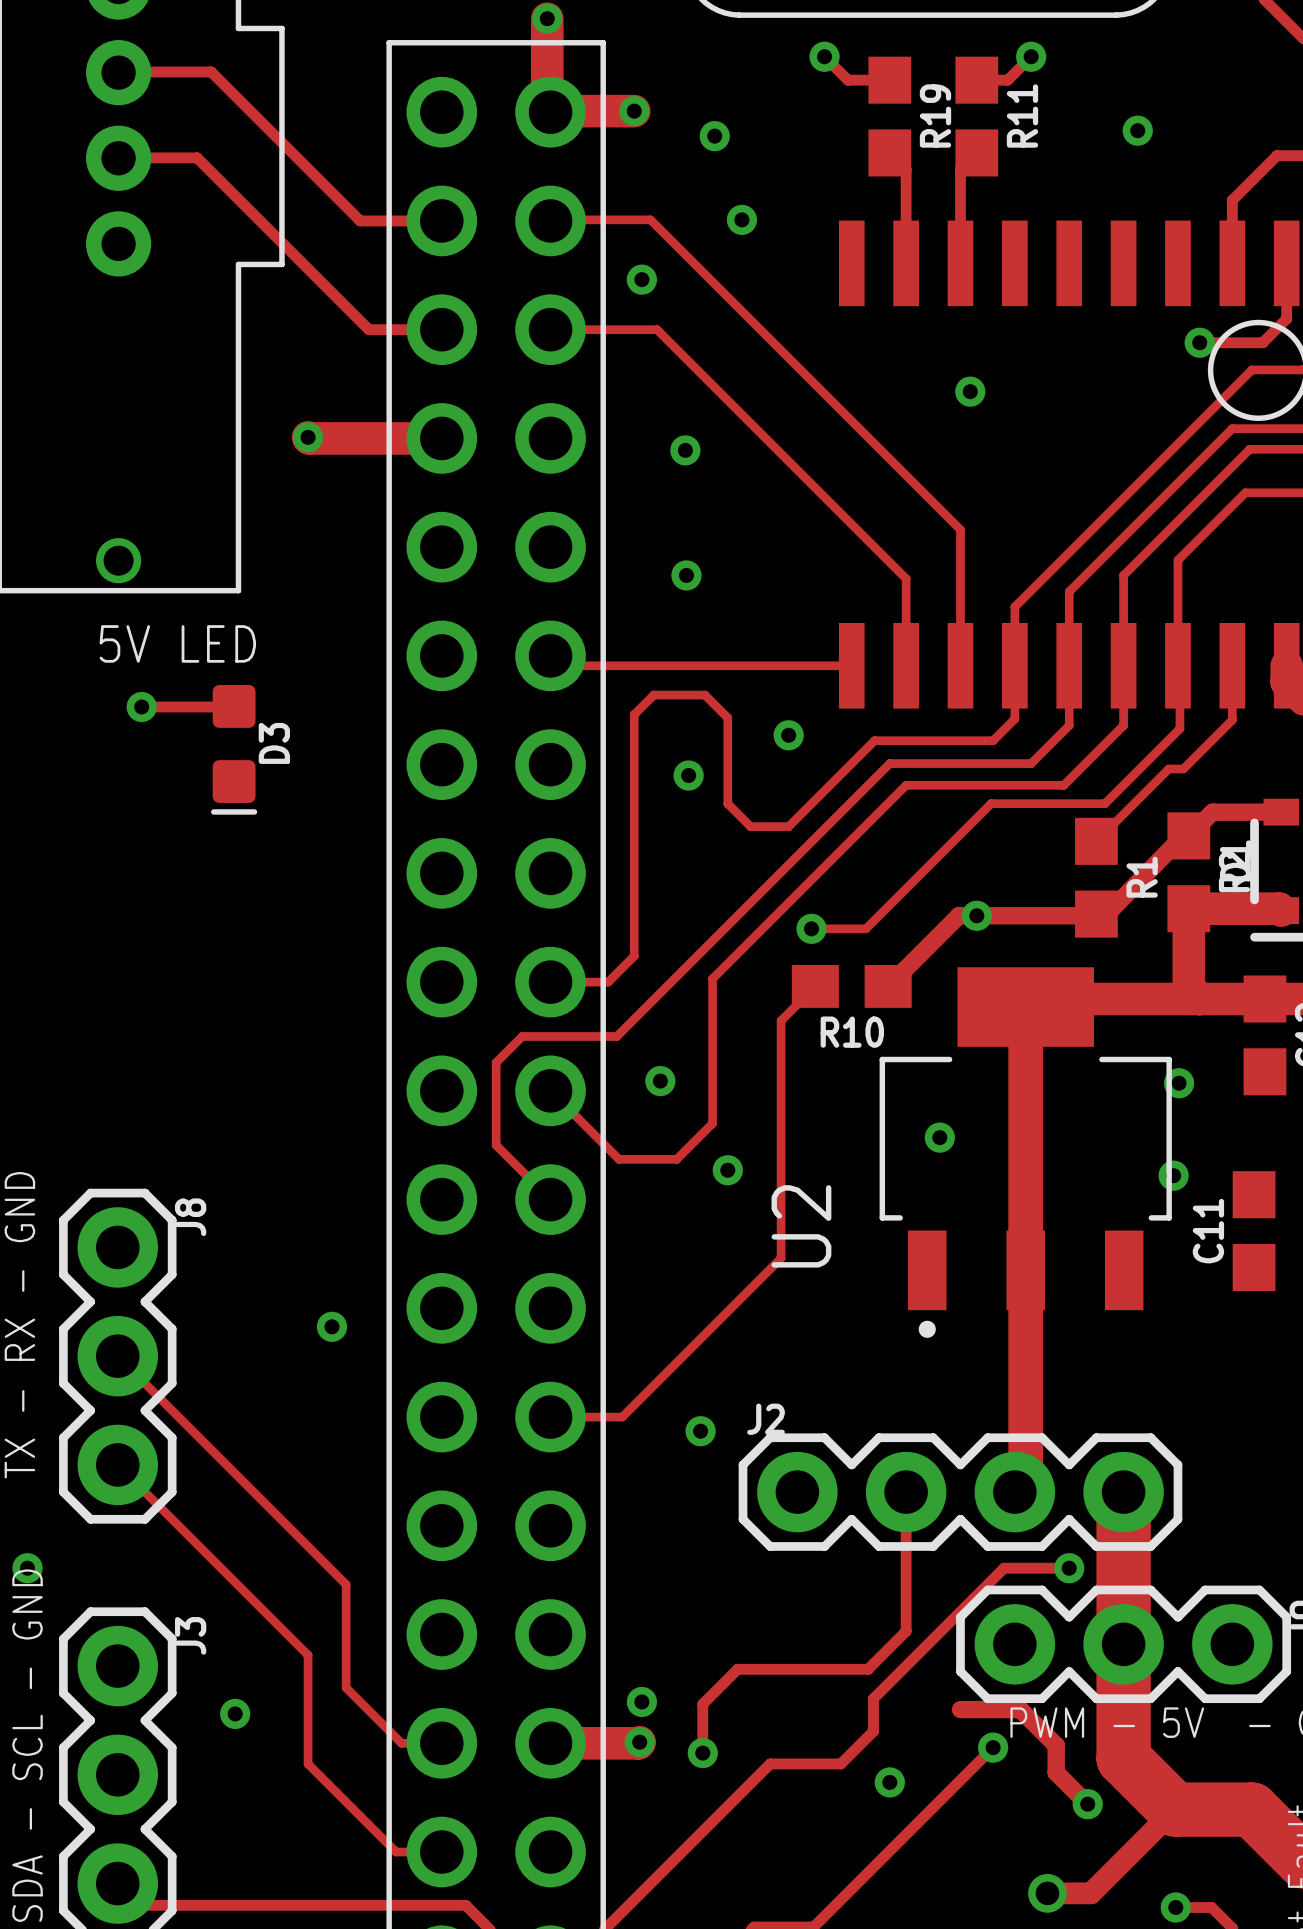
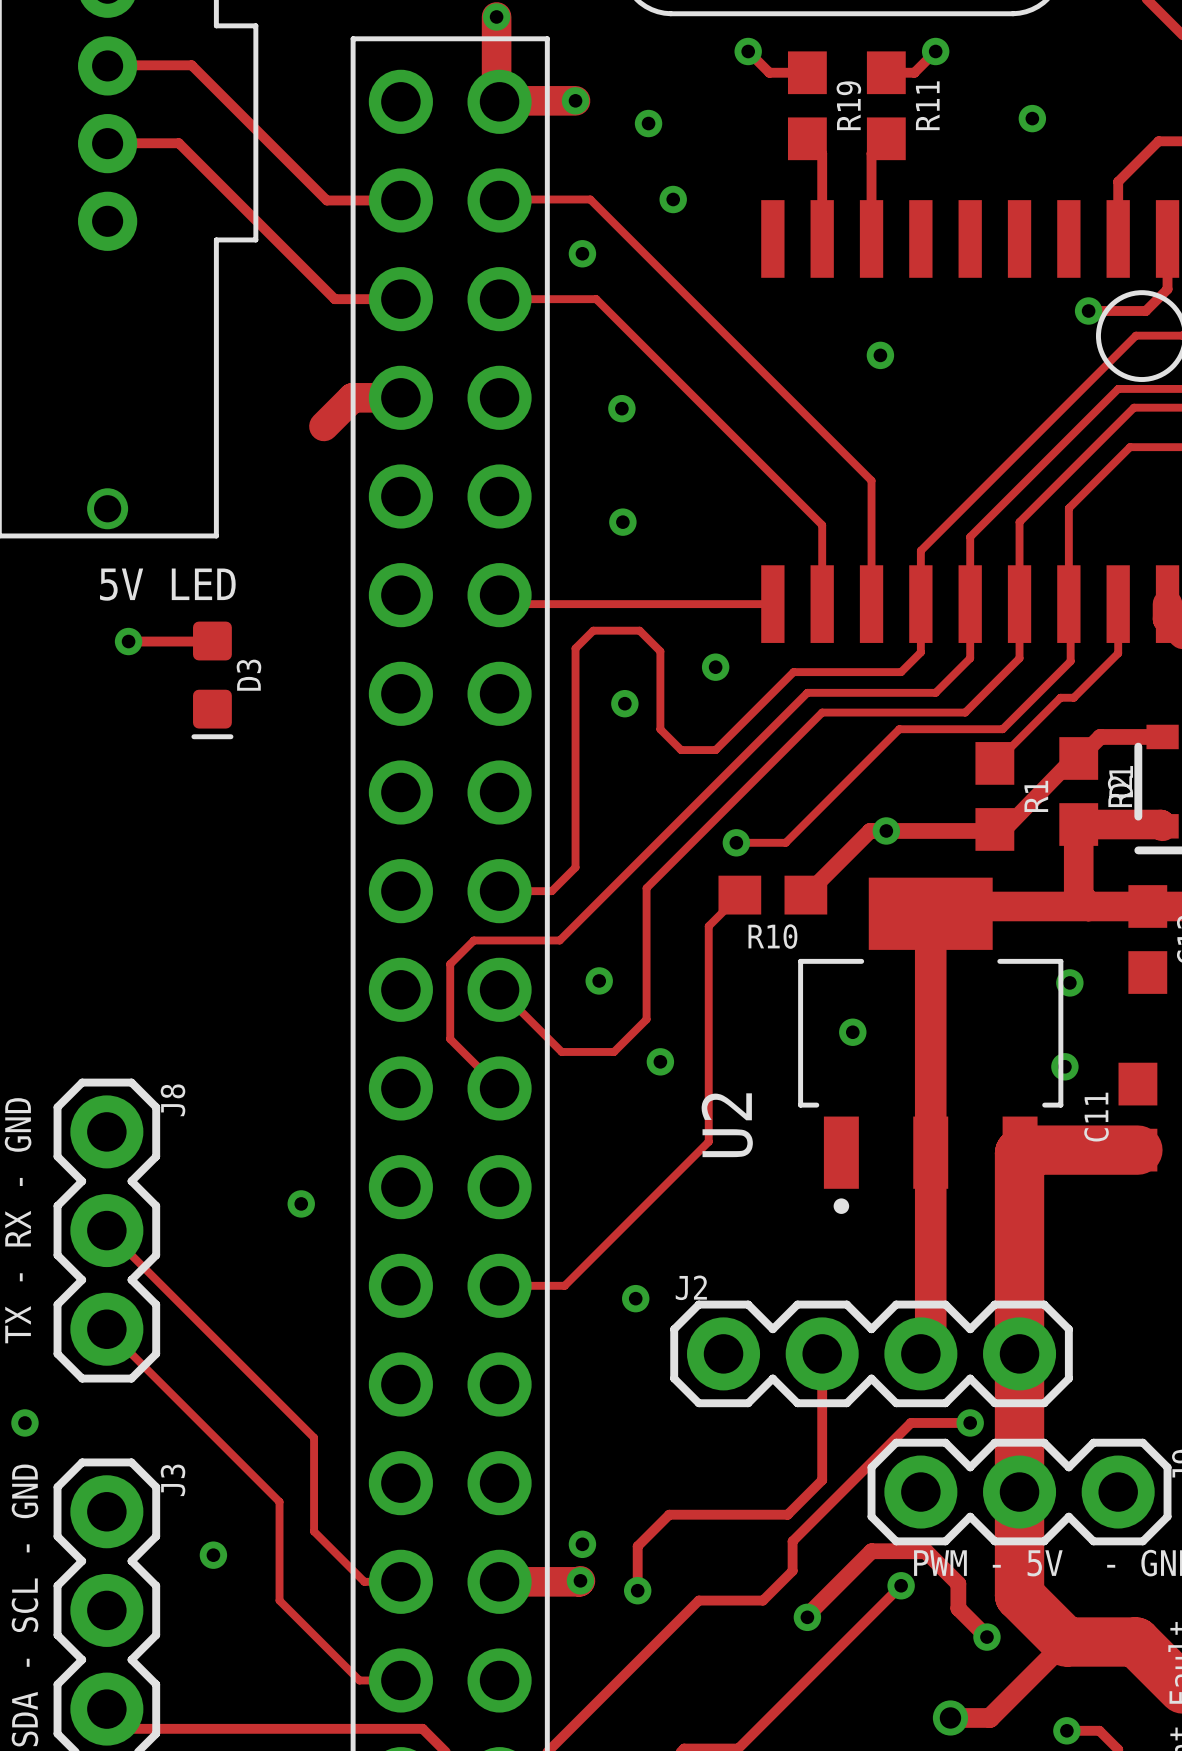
track: (308, 437) (388, 438) -> (323, 426) (352, 397)
via: (308, 437) -> none
track: none -> (1137, 1150) (1022, 1150) (1019, 1153) (1019, 1353)
track: none -> (871, 1551) (808, 1614)

